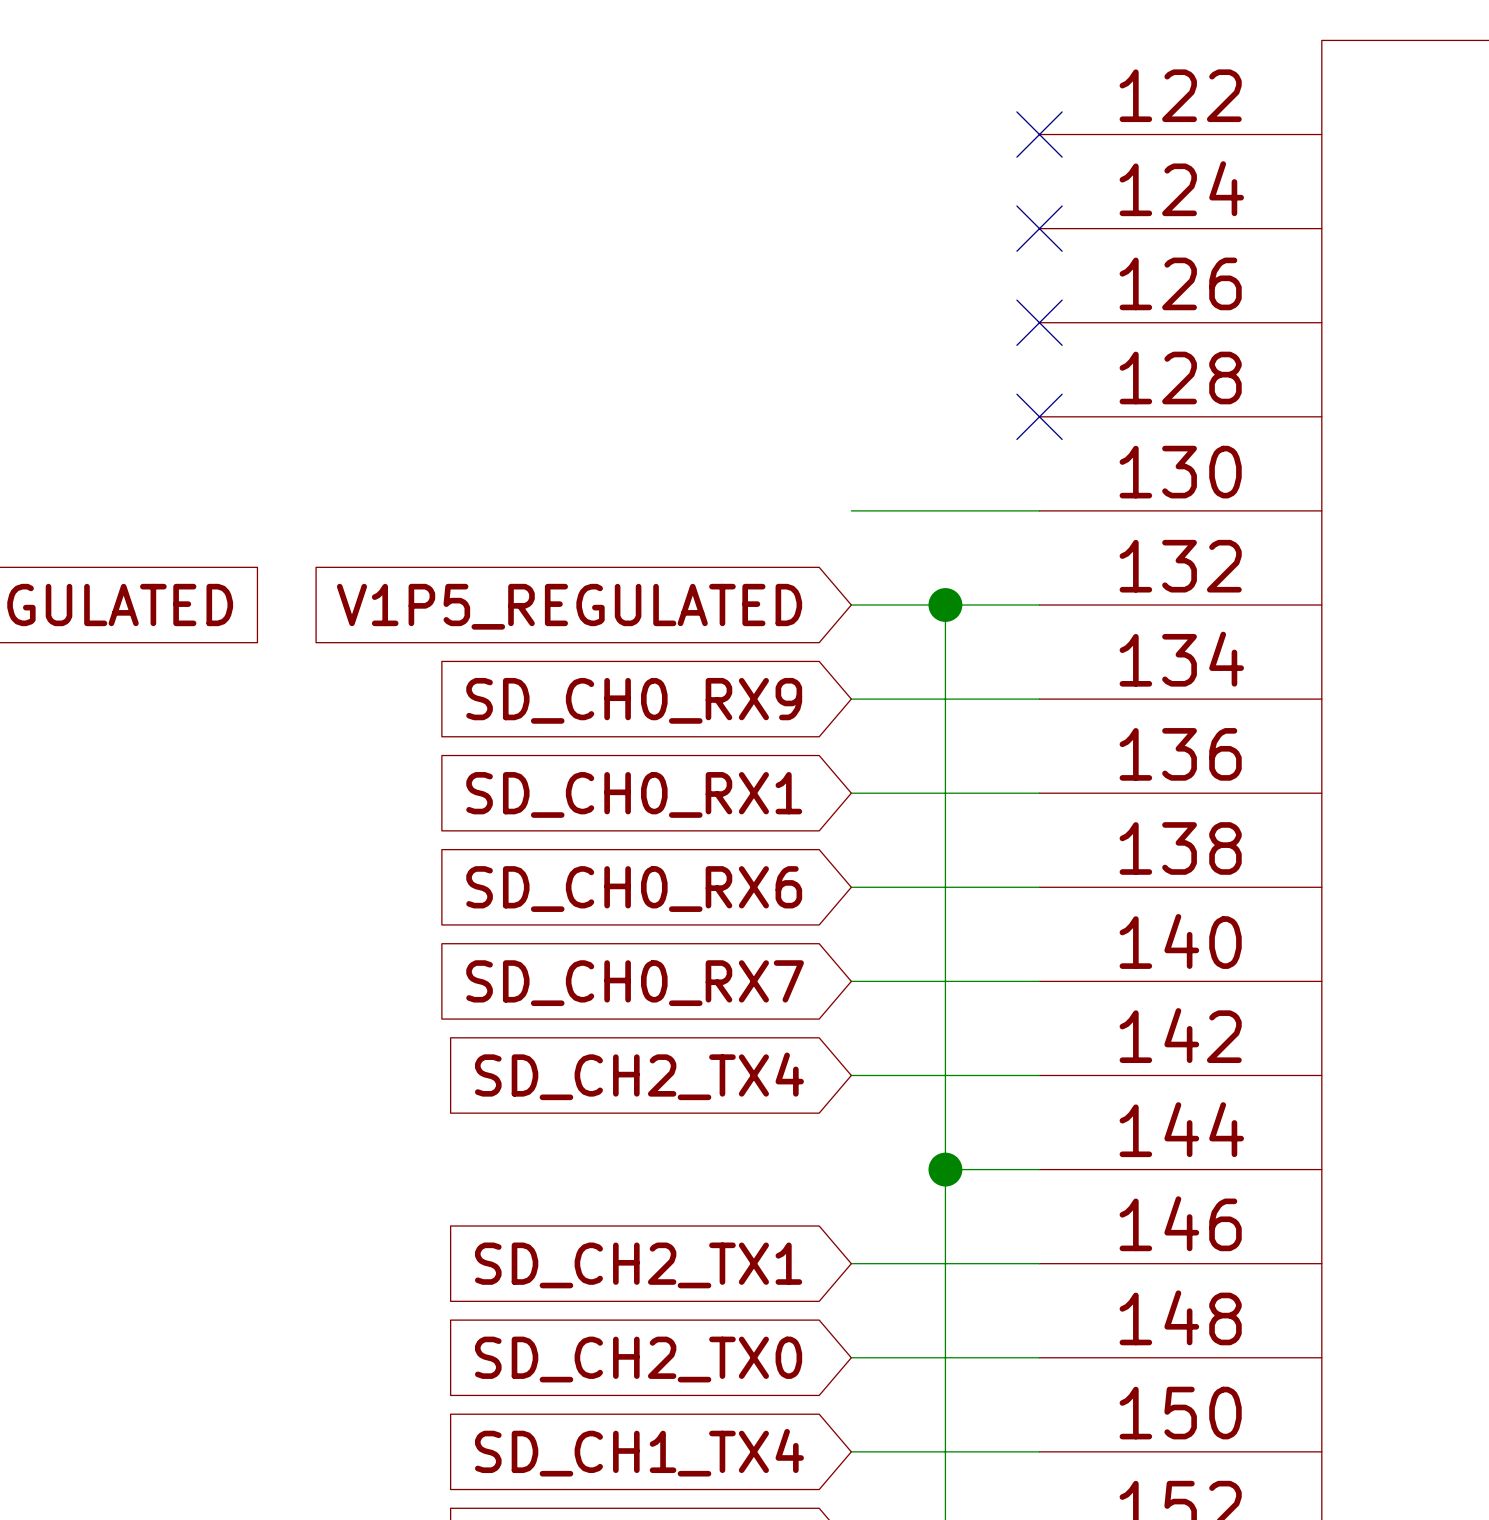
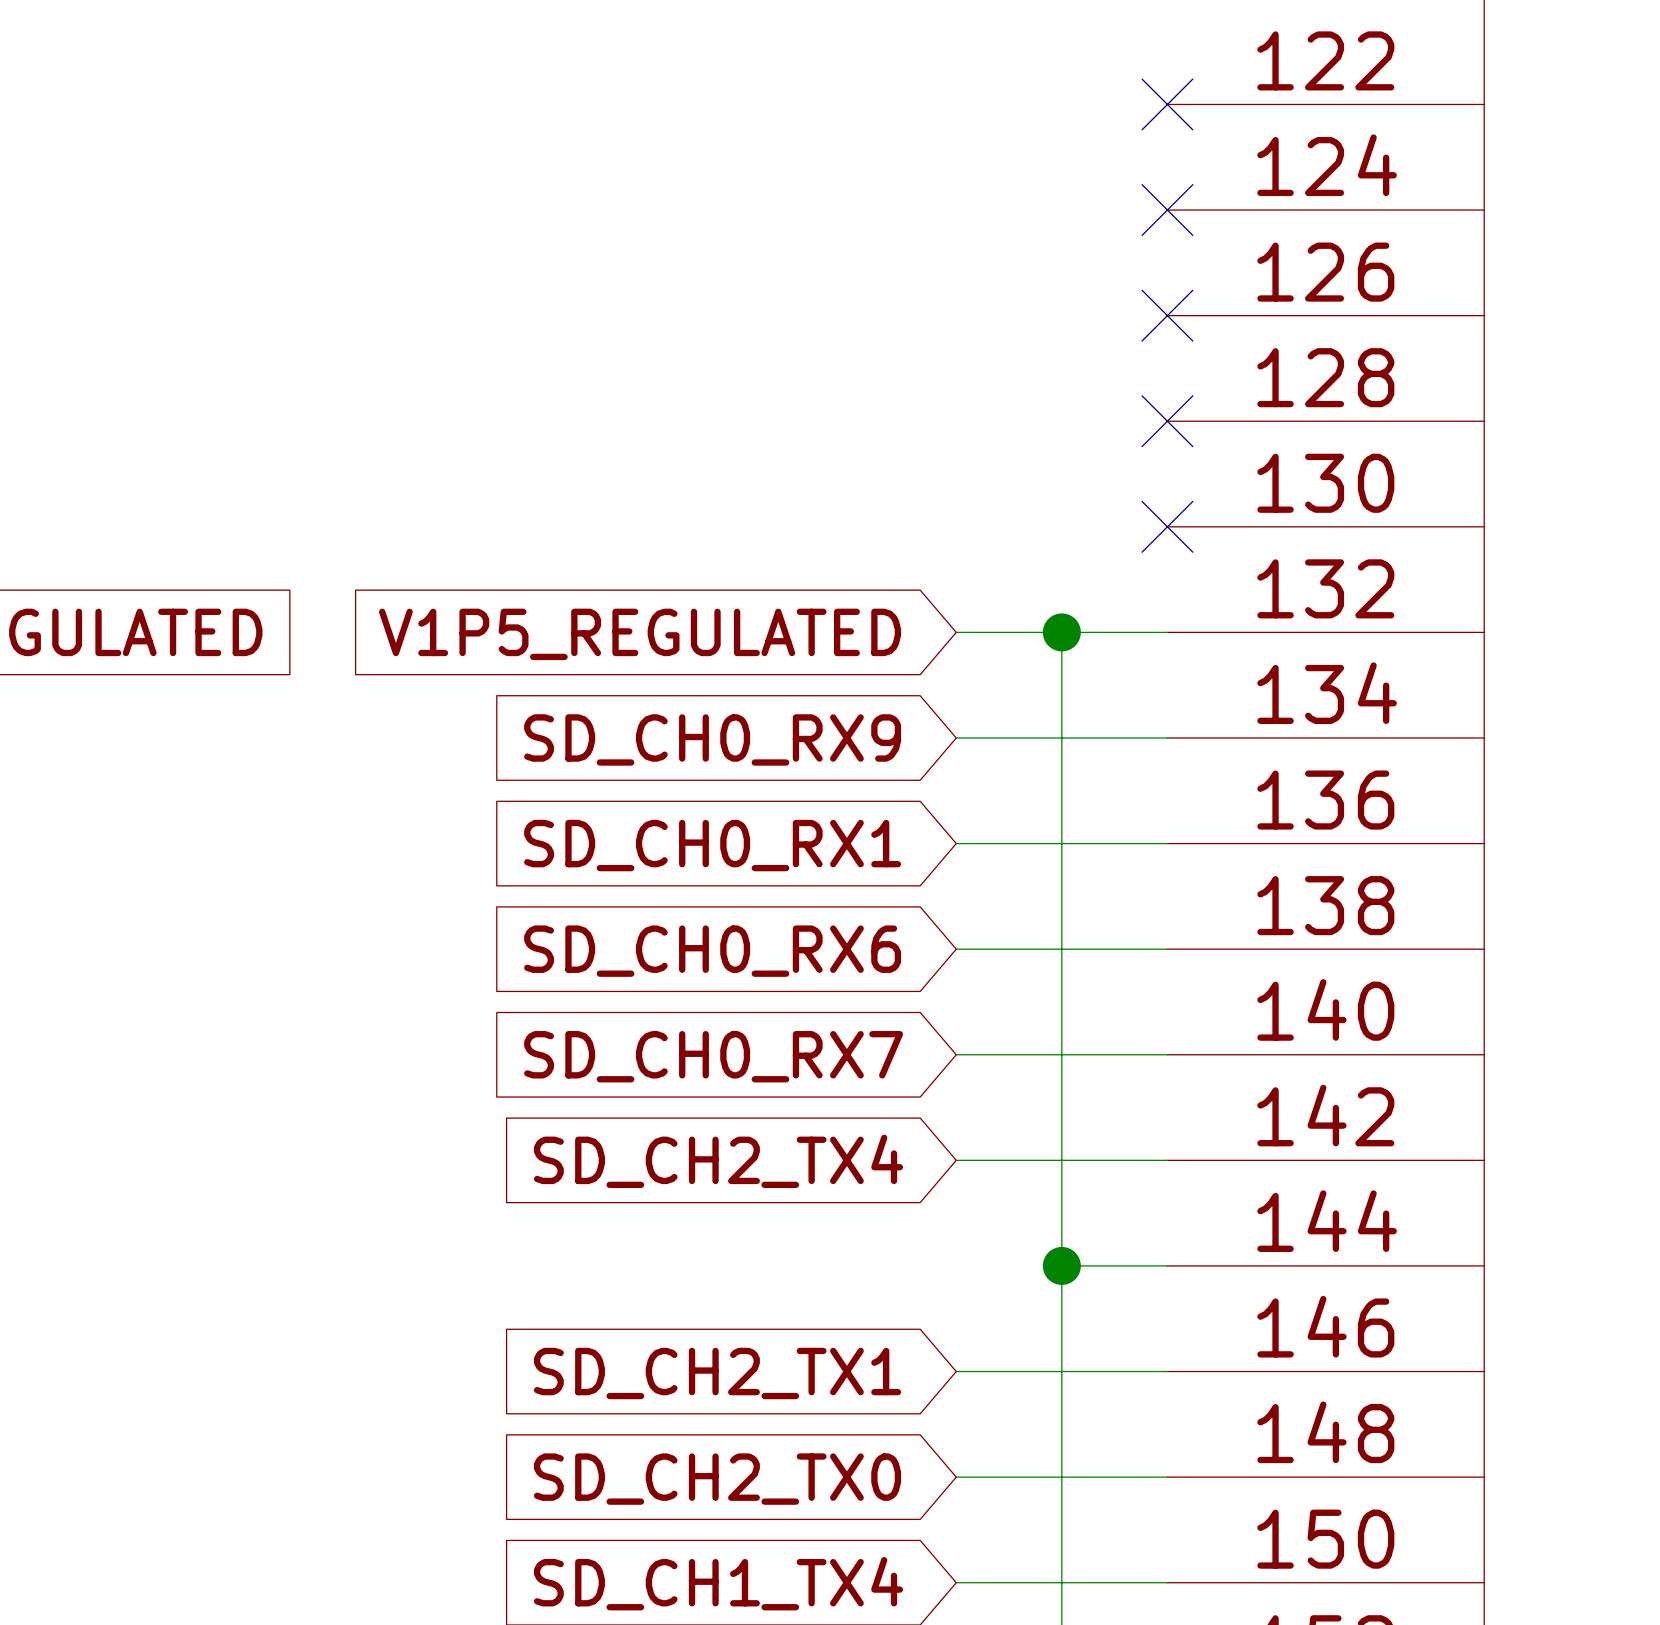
wire: (851, 510) (1039, 510) -> none
no-connect mark: none -> (1167, 526)

